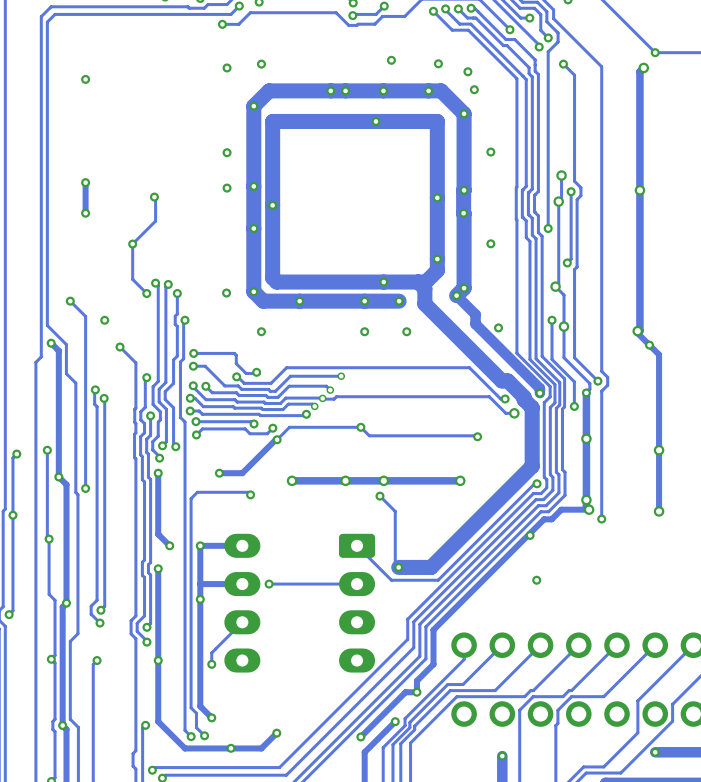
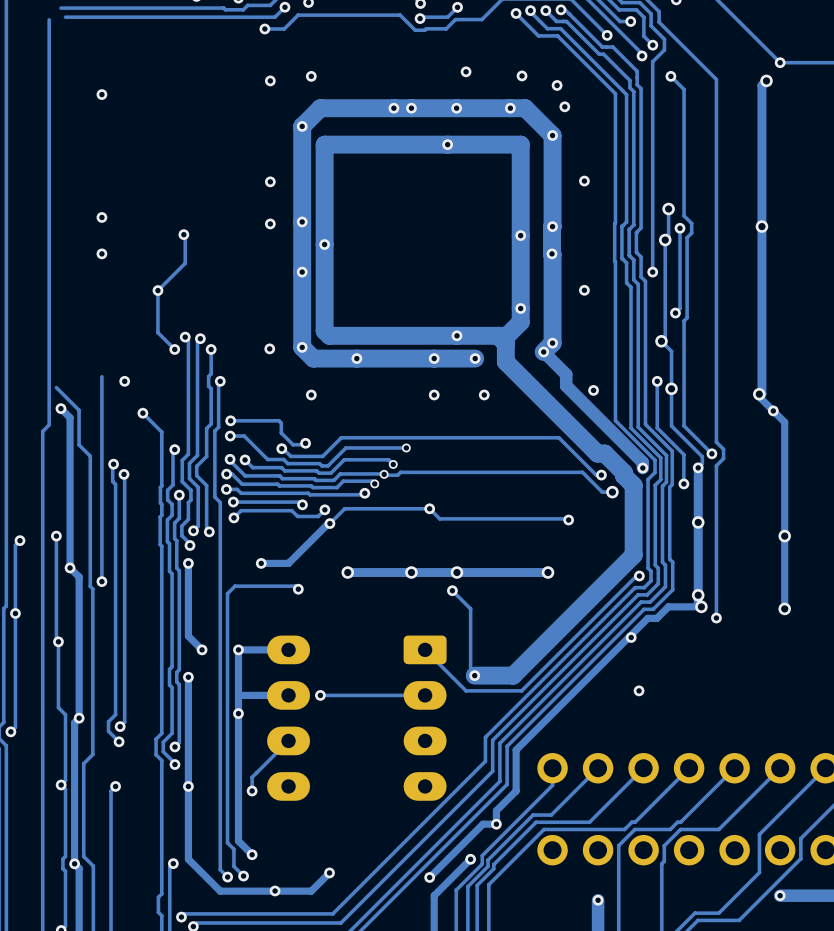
track: (51, 6) (41, 16) -> none
track: (55, 14) (47, 22) (47, 325) -> none
track: (85, 182) (85, 213) -> none
track: (70, 301) (85, 316) -> none
via: (70, 301) -> none

